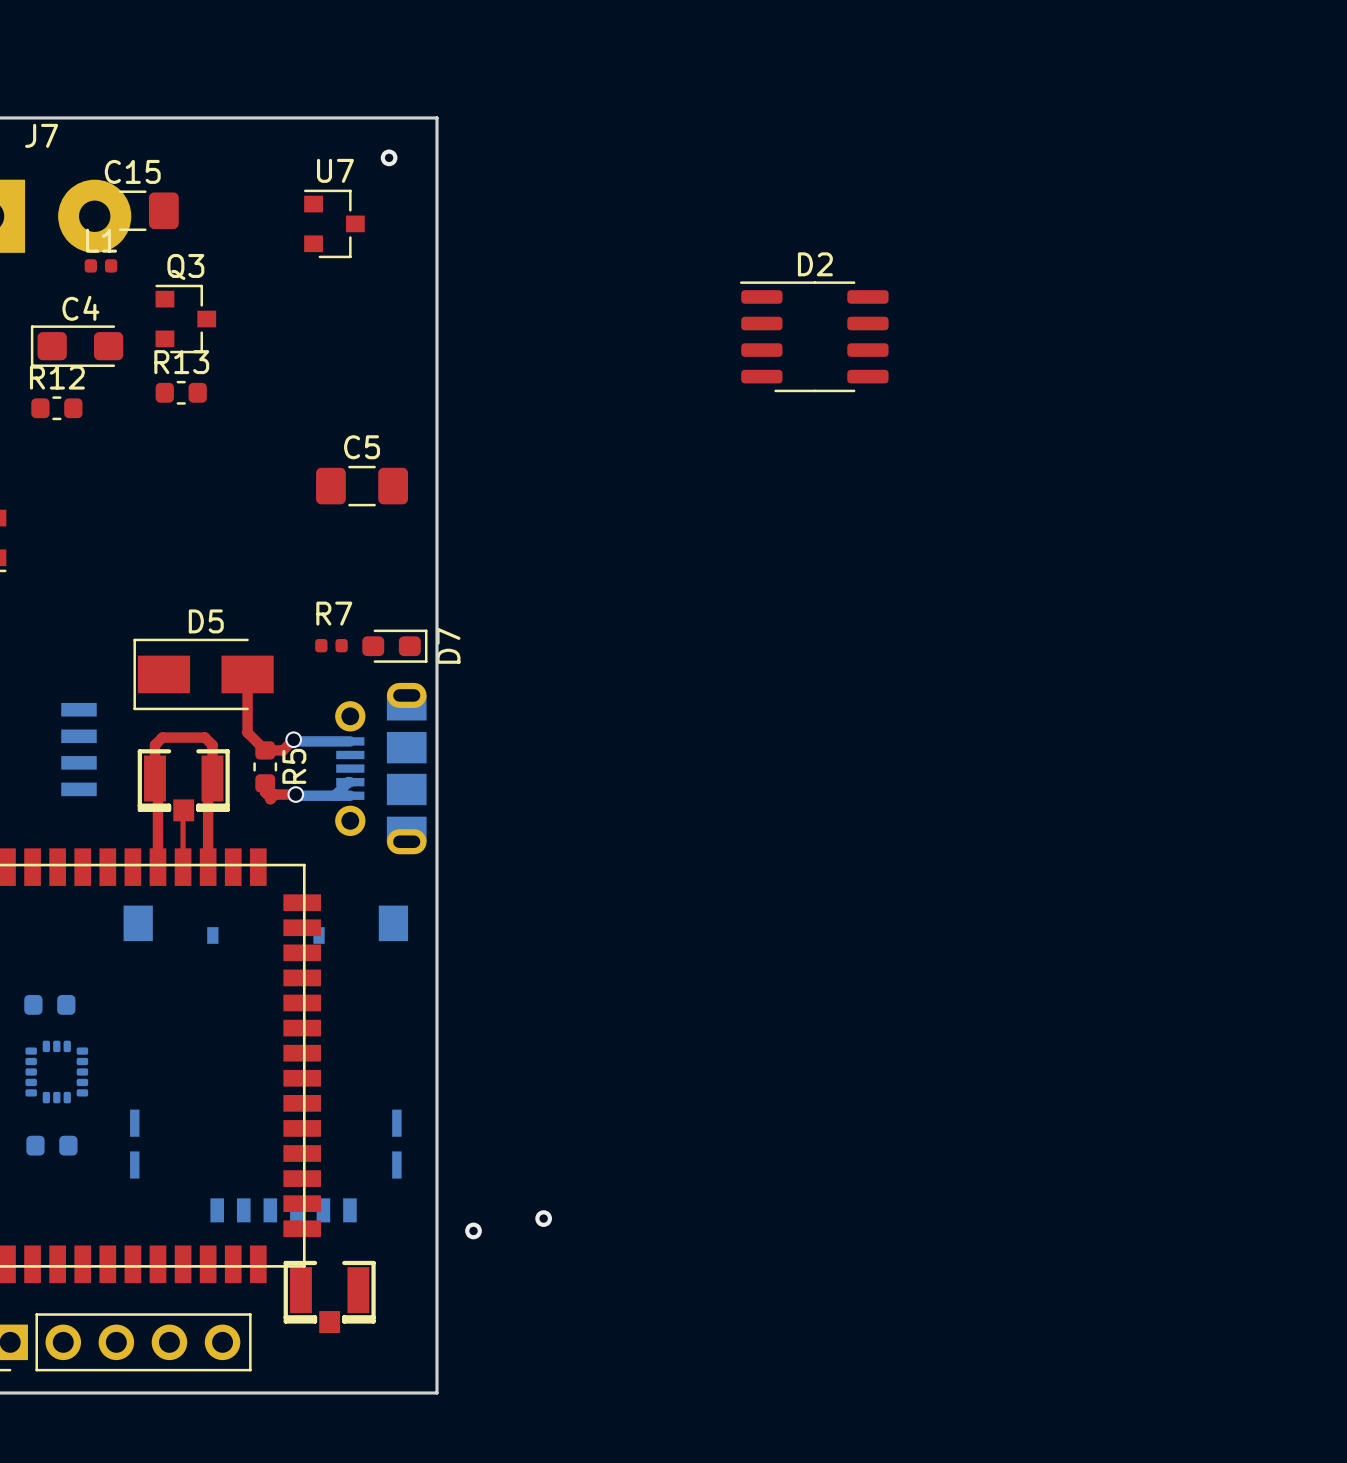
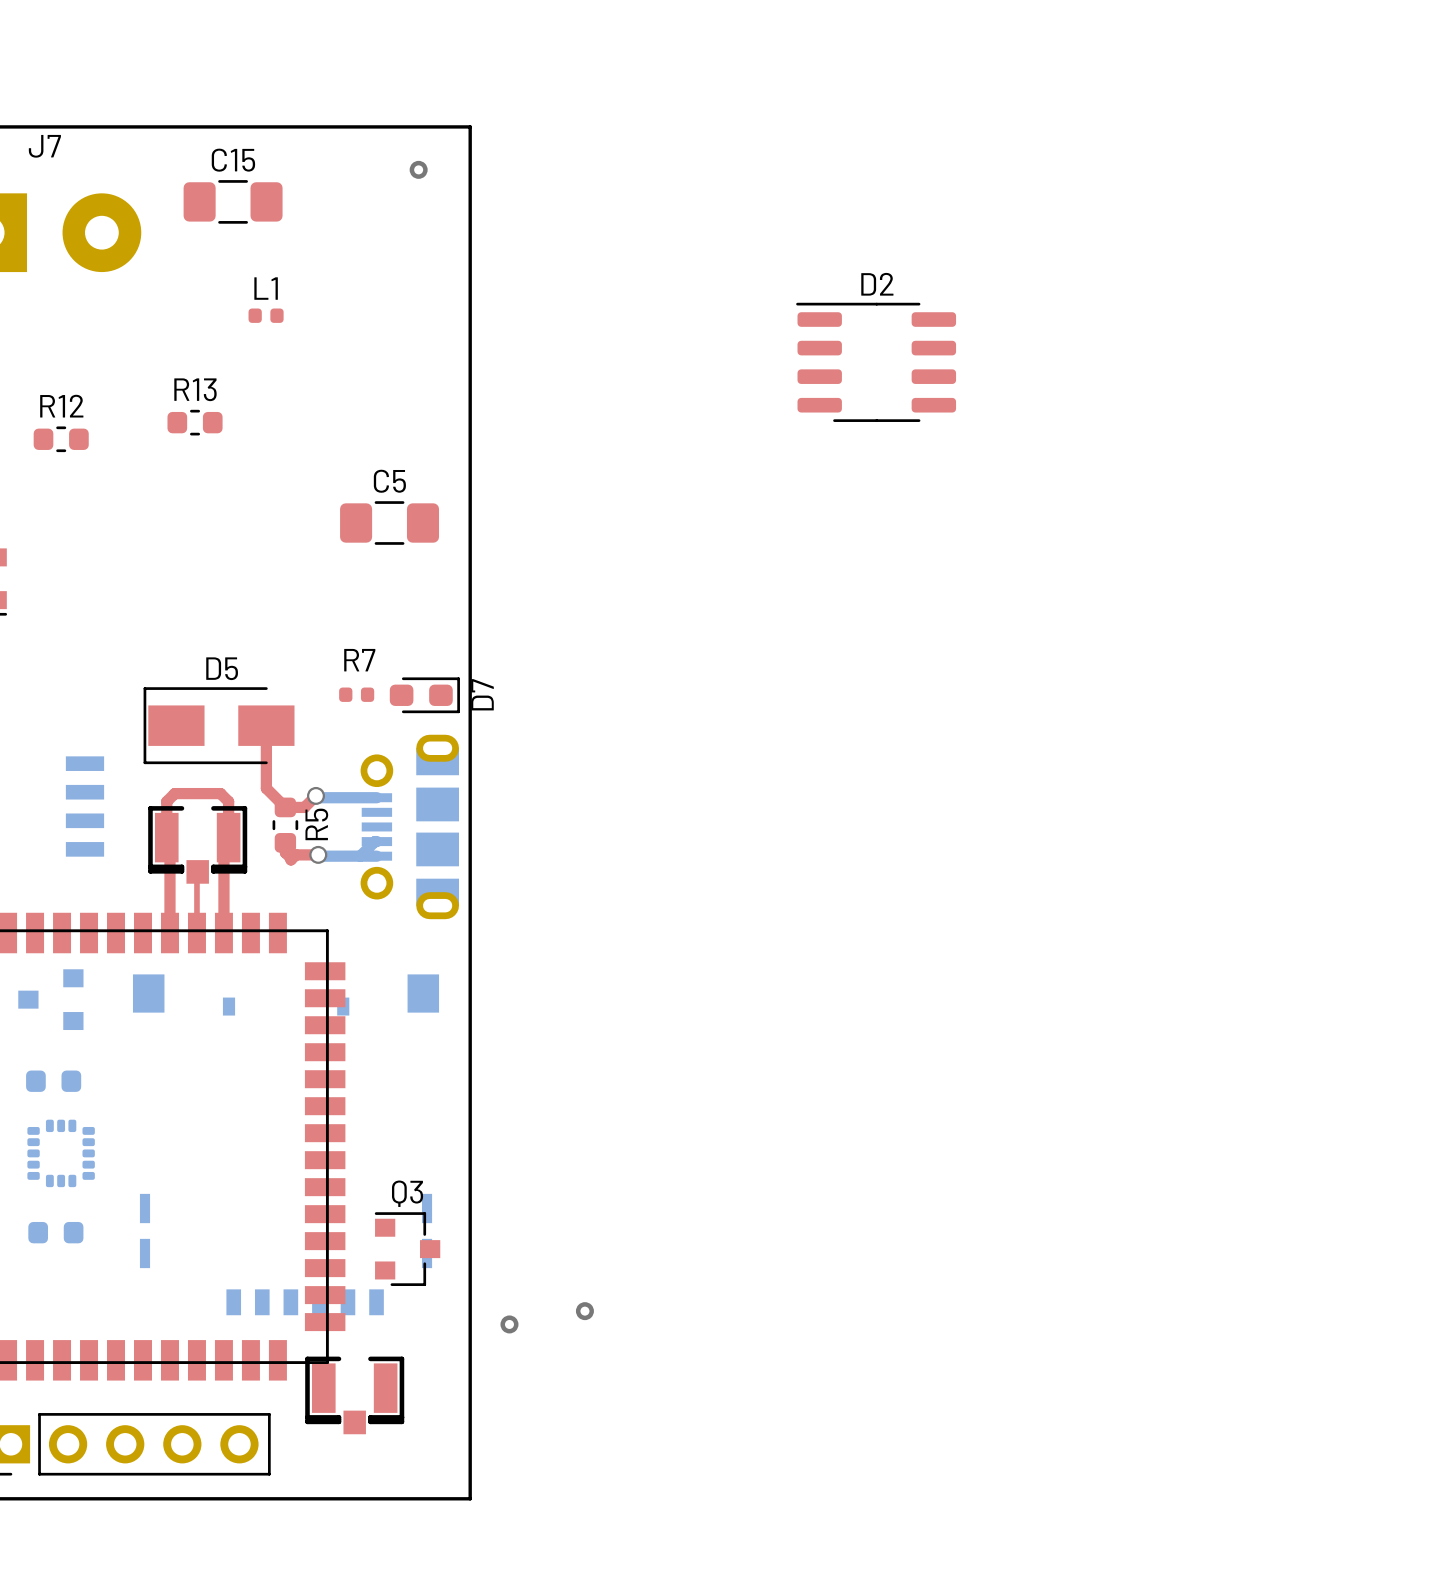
C15 position: (132, 210) -> (233, 201)
U7: (334, 223) -> none
L1 position: (100, 265) -> (266, 315)
Q3 position: (185, 319) -> (407, 1249)
C4: (77, 346) -> none
part: none -> (50, 999)

